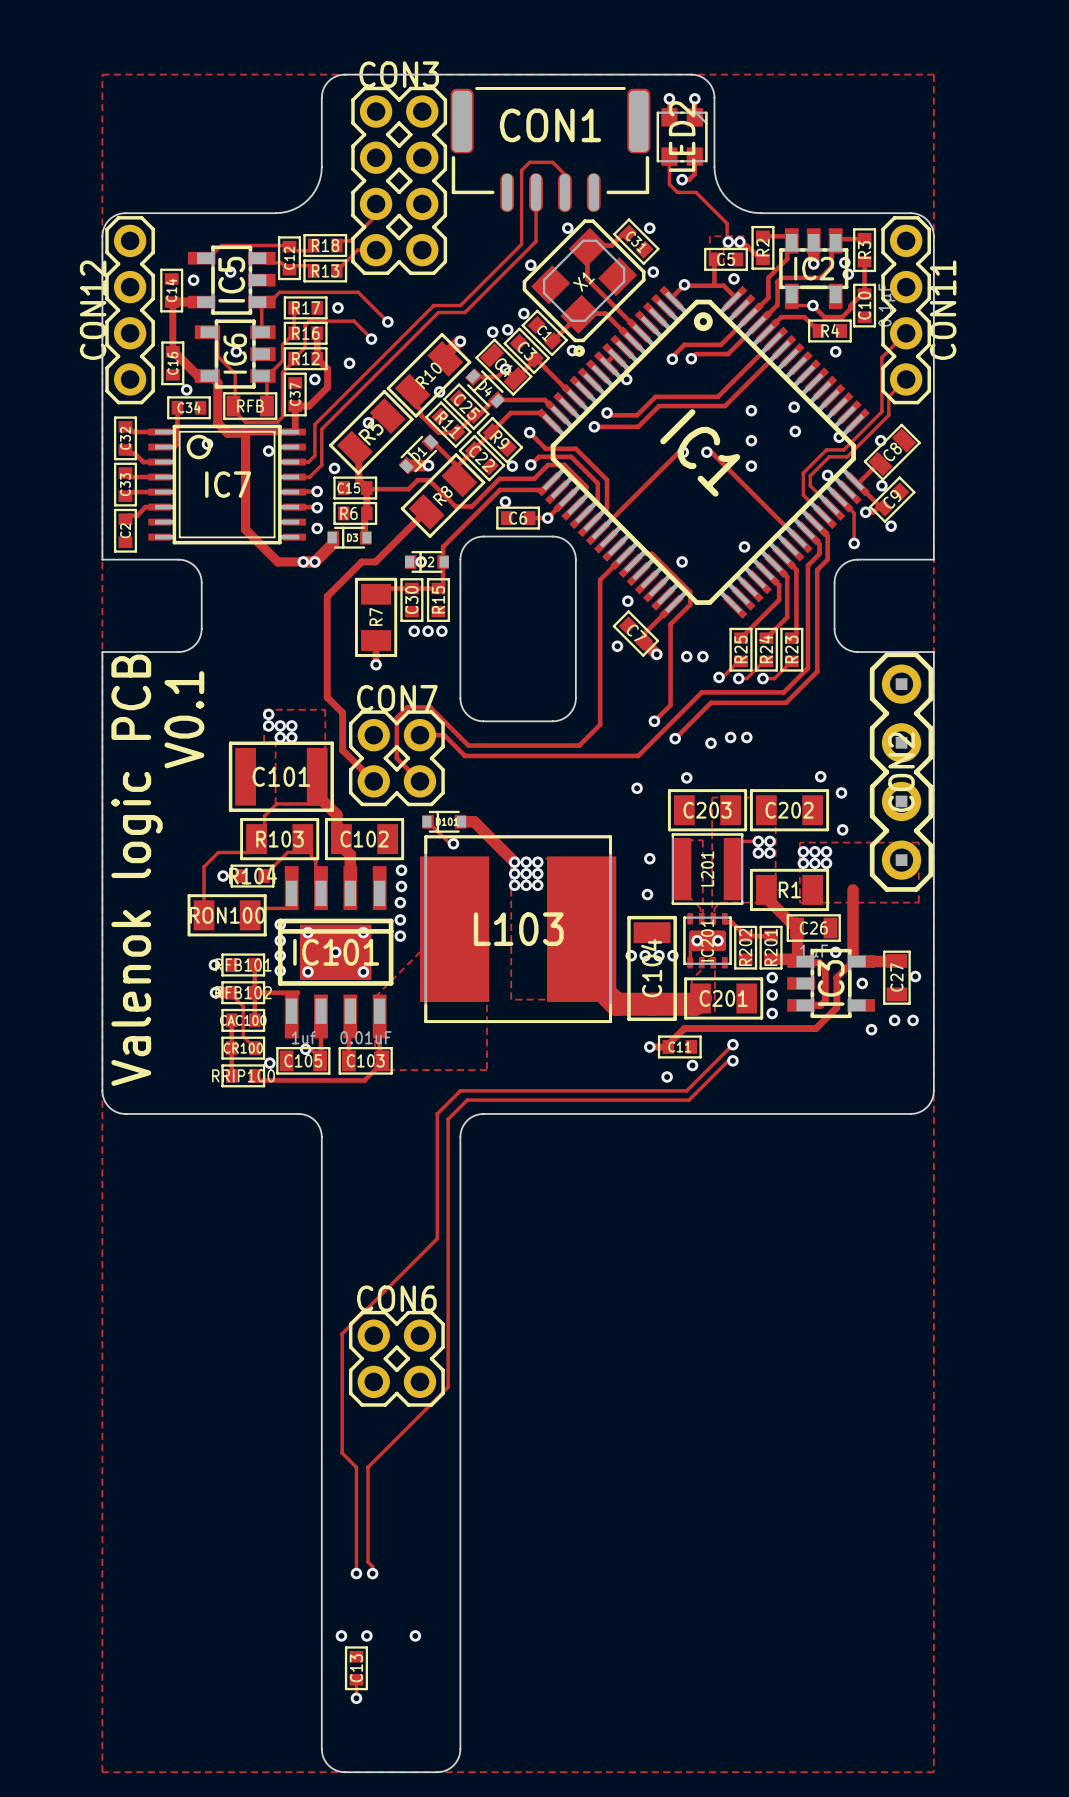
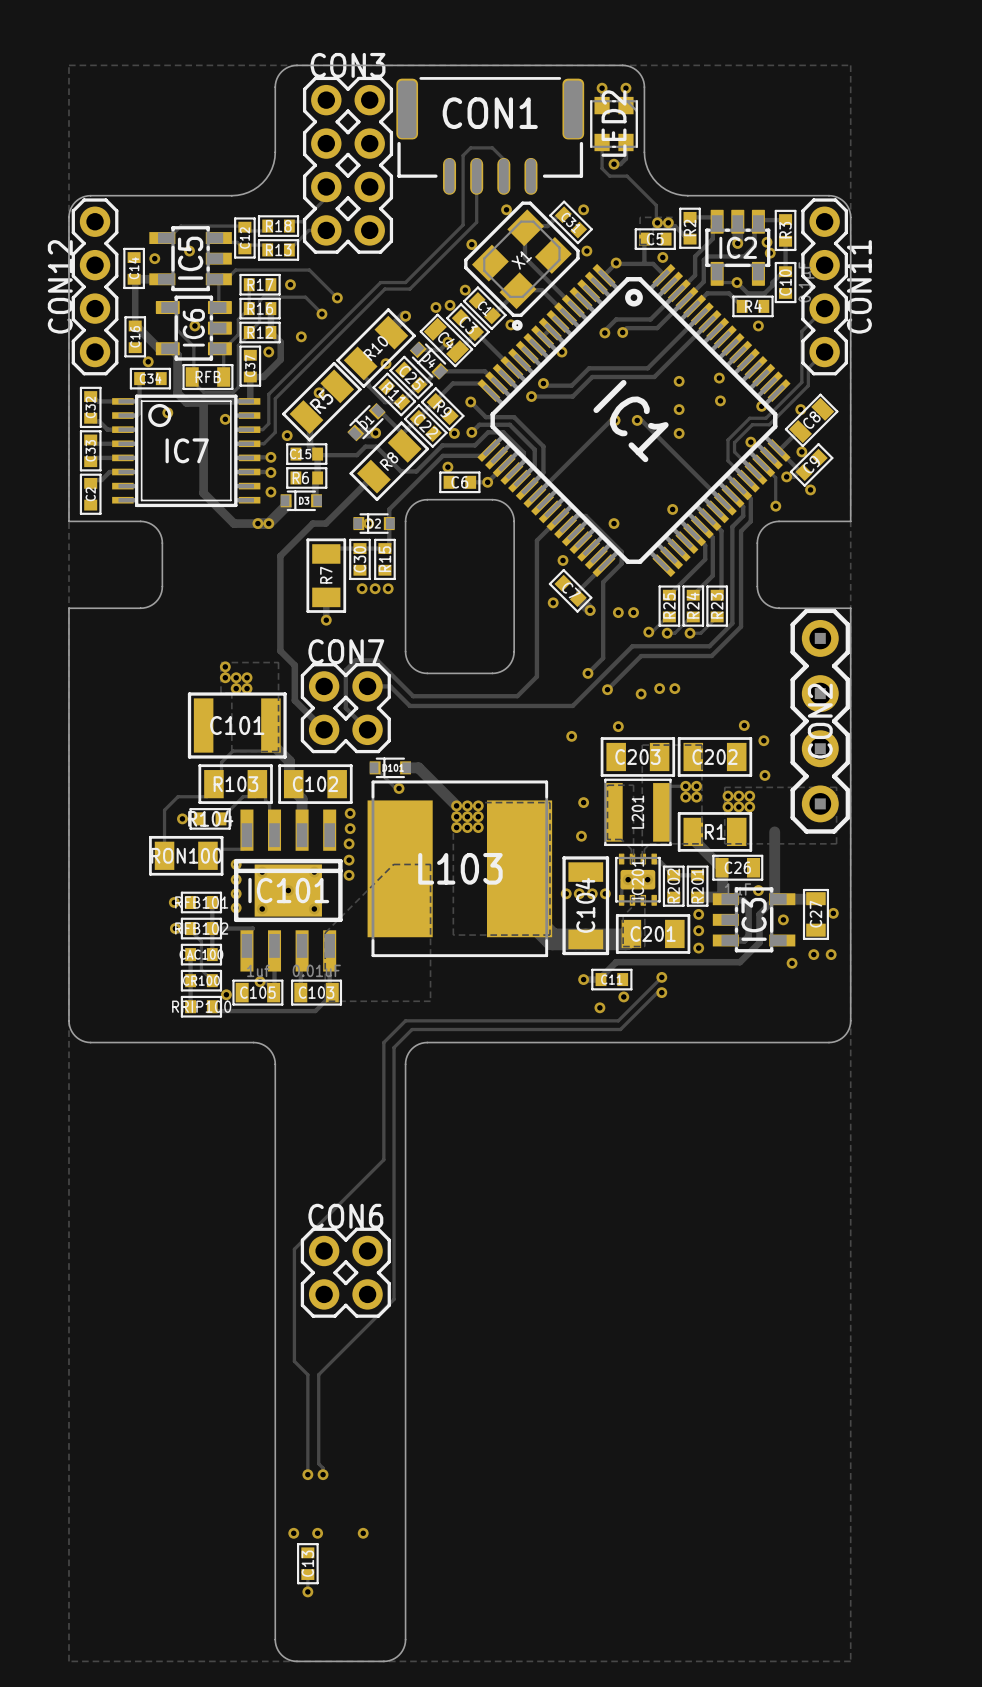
text: V0.1 (184, 719) -> none
text: Valenok logic PCB (137, 870) -> none

